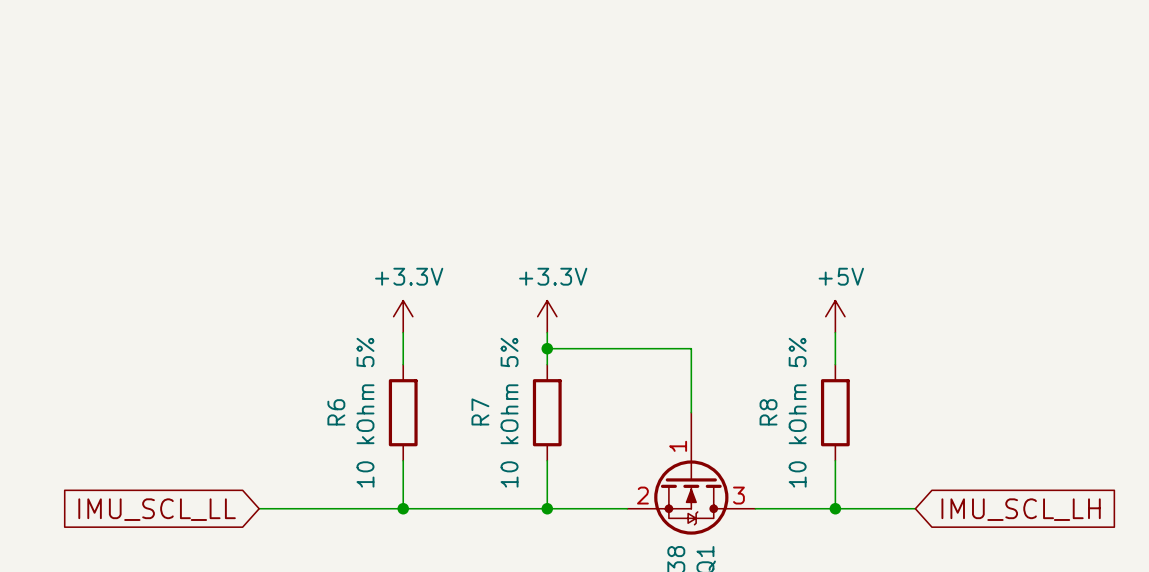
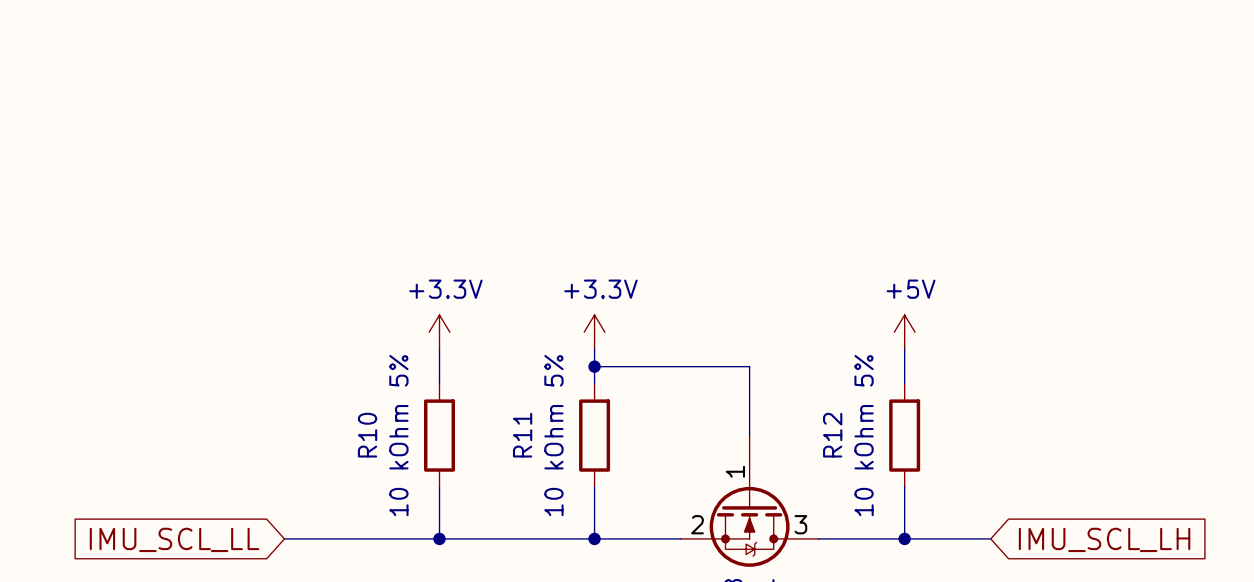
R7 name: R7 (480, 411) -> R11 (522, 435)
R6 name: R6 (336, 412) -> R10 (367, 435)
R8 name: R8 (768, 412) -> R12 (832, 435)

